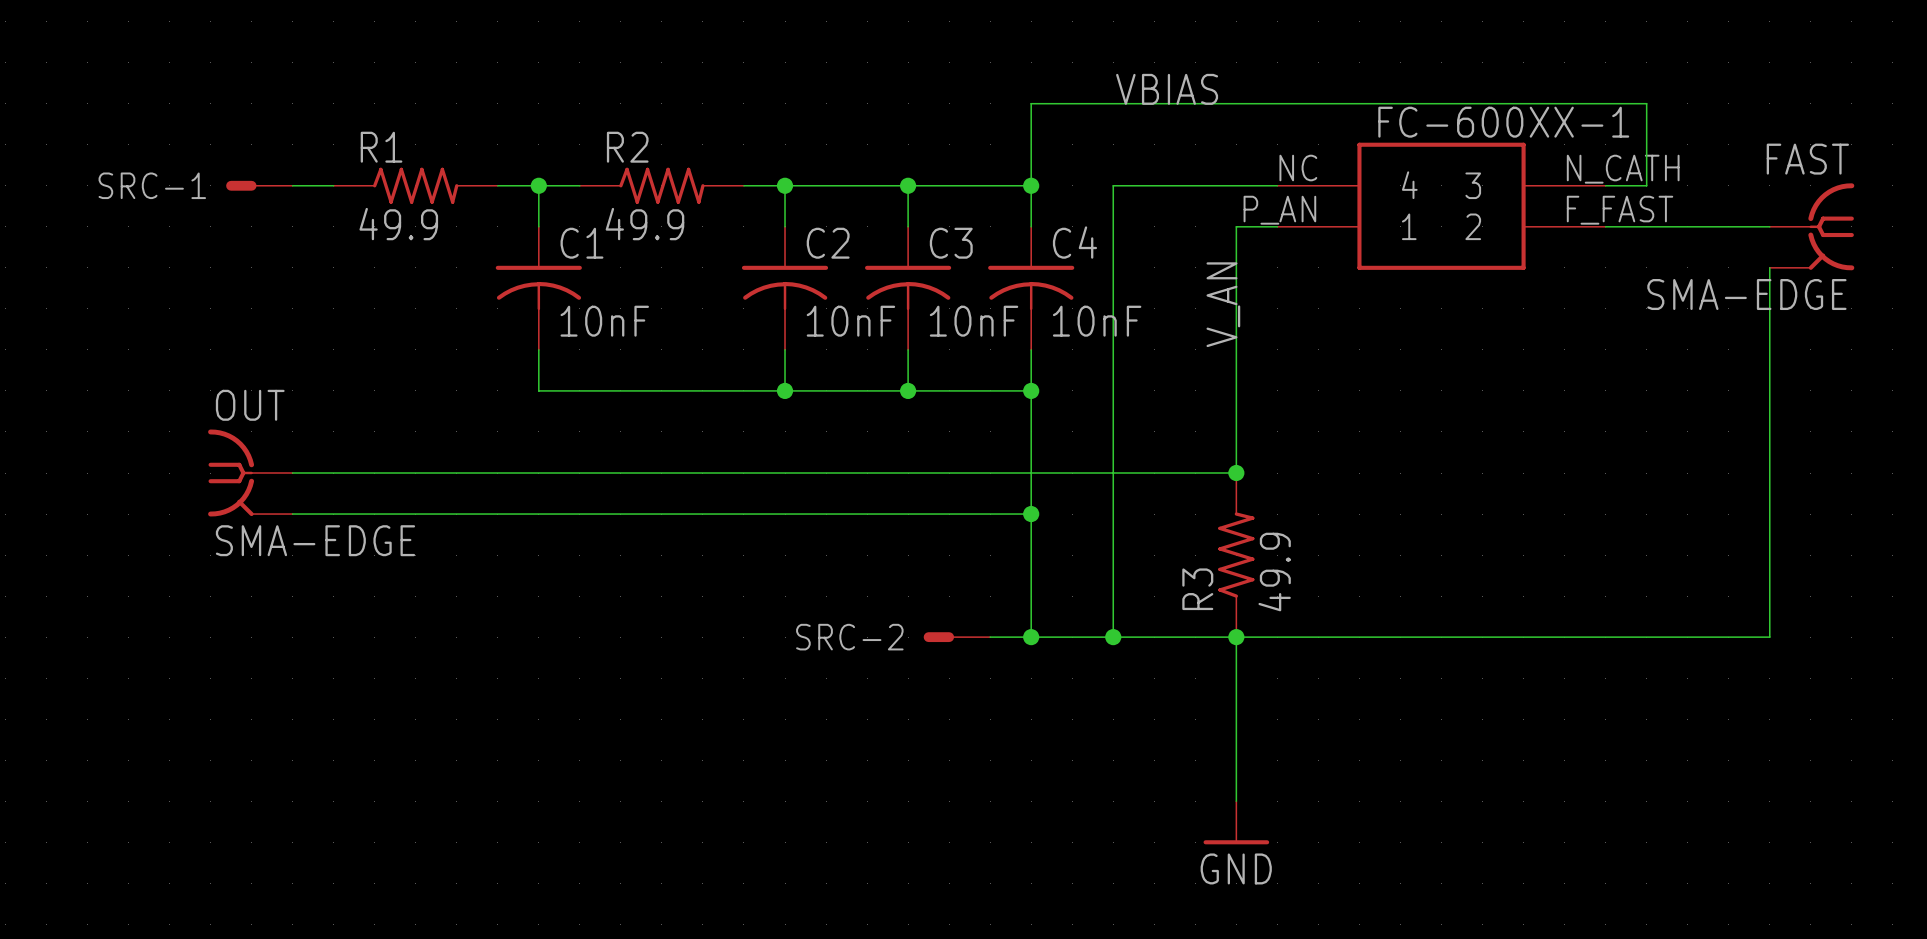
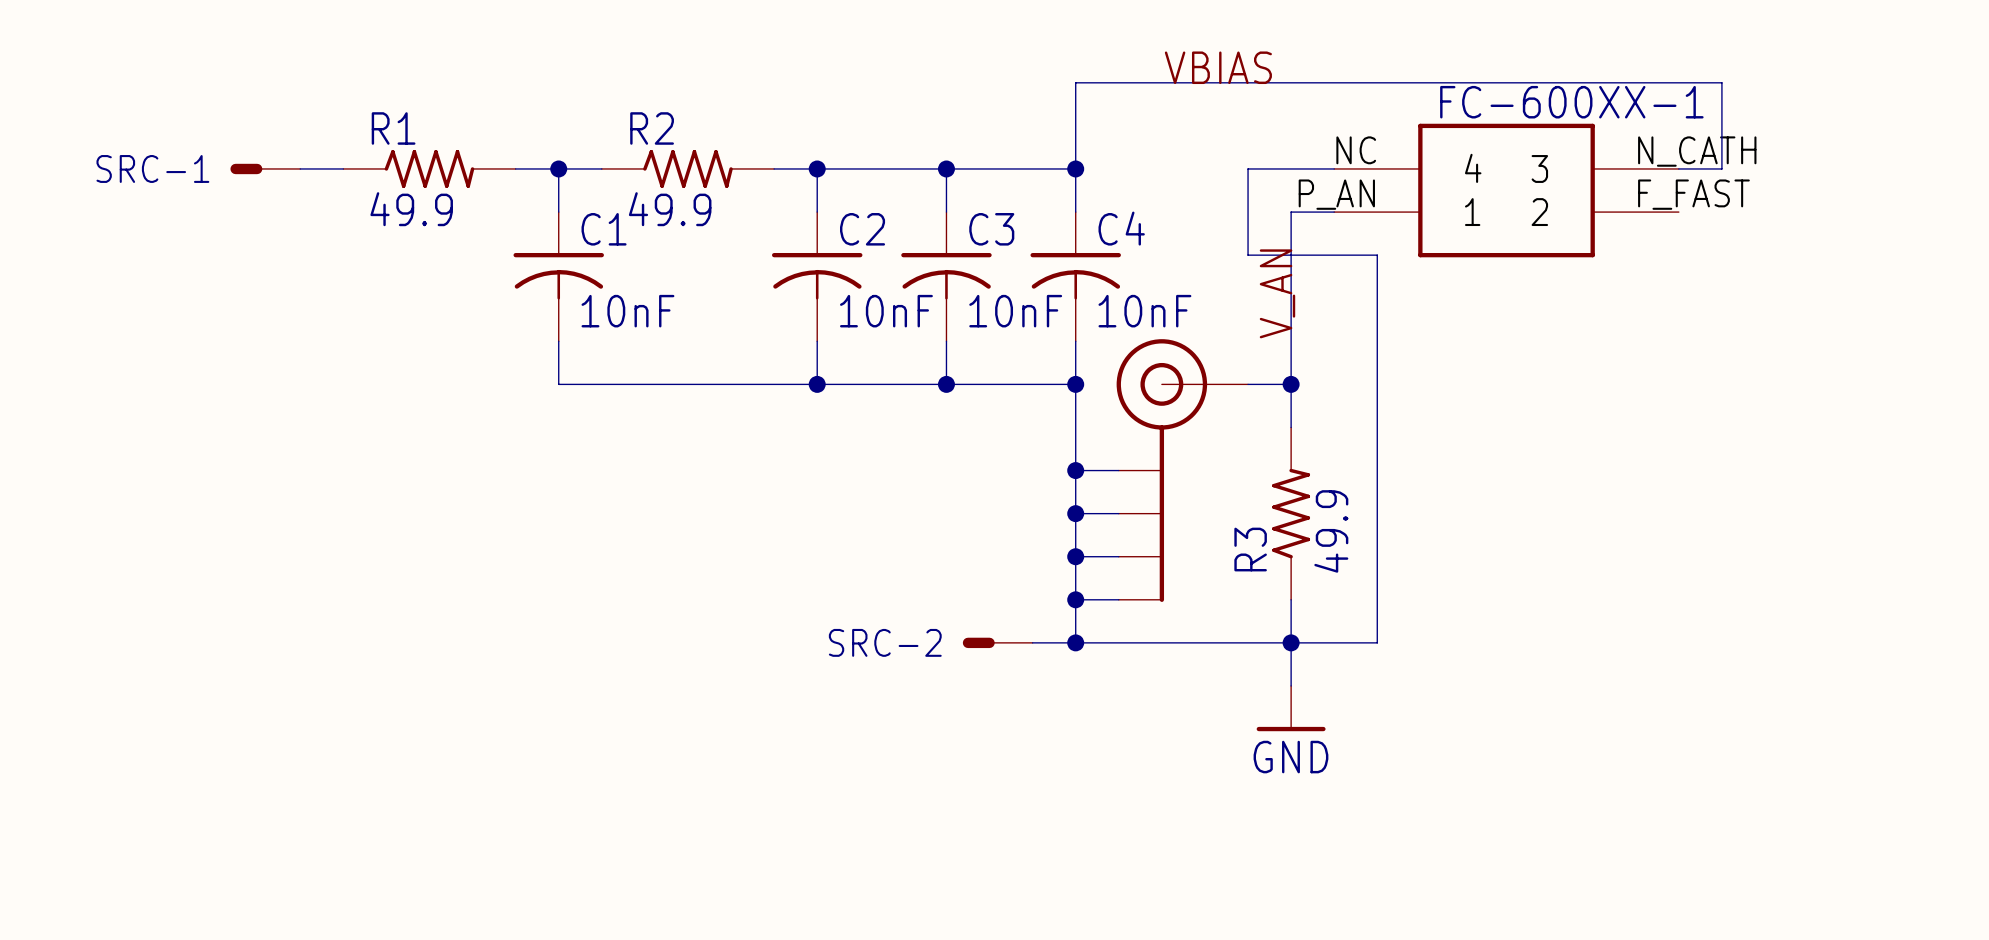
wire: (1195, 185) (1113, 185) (1113, 637) -> (1248, 168) (1248, 255) (1377, 255) (1377, 642)
wire: (1605, 226) (1769, 226) -> none
FAST: SMA-EDGE (1812, 226) -> none
wire: (1769, 267) (1769, 637) (1318, 637) -> none
wire: none -> (1248, 384) (1291, 384)
wire: (1236, 431) (1236, 473) (1072, 473) -> none
OUT: SMA-EDGE (250, 473) -> none
wire: (292, 473) (1031, 473) -> none
junction: none -> (1075, 470)
part: none -> (1182, 470)
junction position: (1236, 473) -> (1291, 384)
wire: (292, 514) (1031, 514) -> (1118, 513) (1075, 513)
wire: none -> (1075, 556) (1118, 556)
junction: none -> (1075, 556)
R3 position: (1236, 555) -> (1291, 513)
wire: none -> (1075, 599) (1118, 599)
junction: none -> (1075, 599)
junction: (1113, 637) -> none
wire: (1236, 678) (1236, 801) -> none
power symbol position: GND (1236, 822) -> GND (1291, 708)

